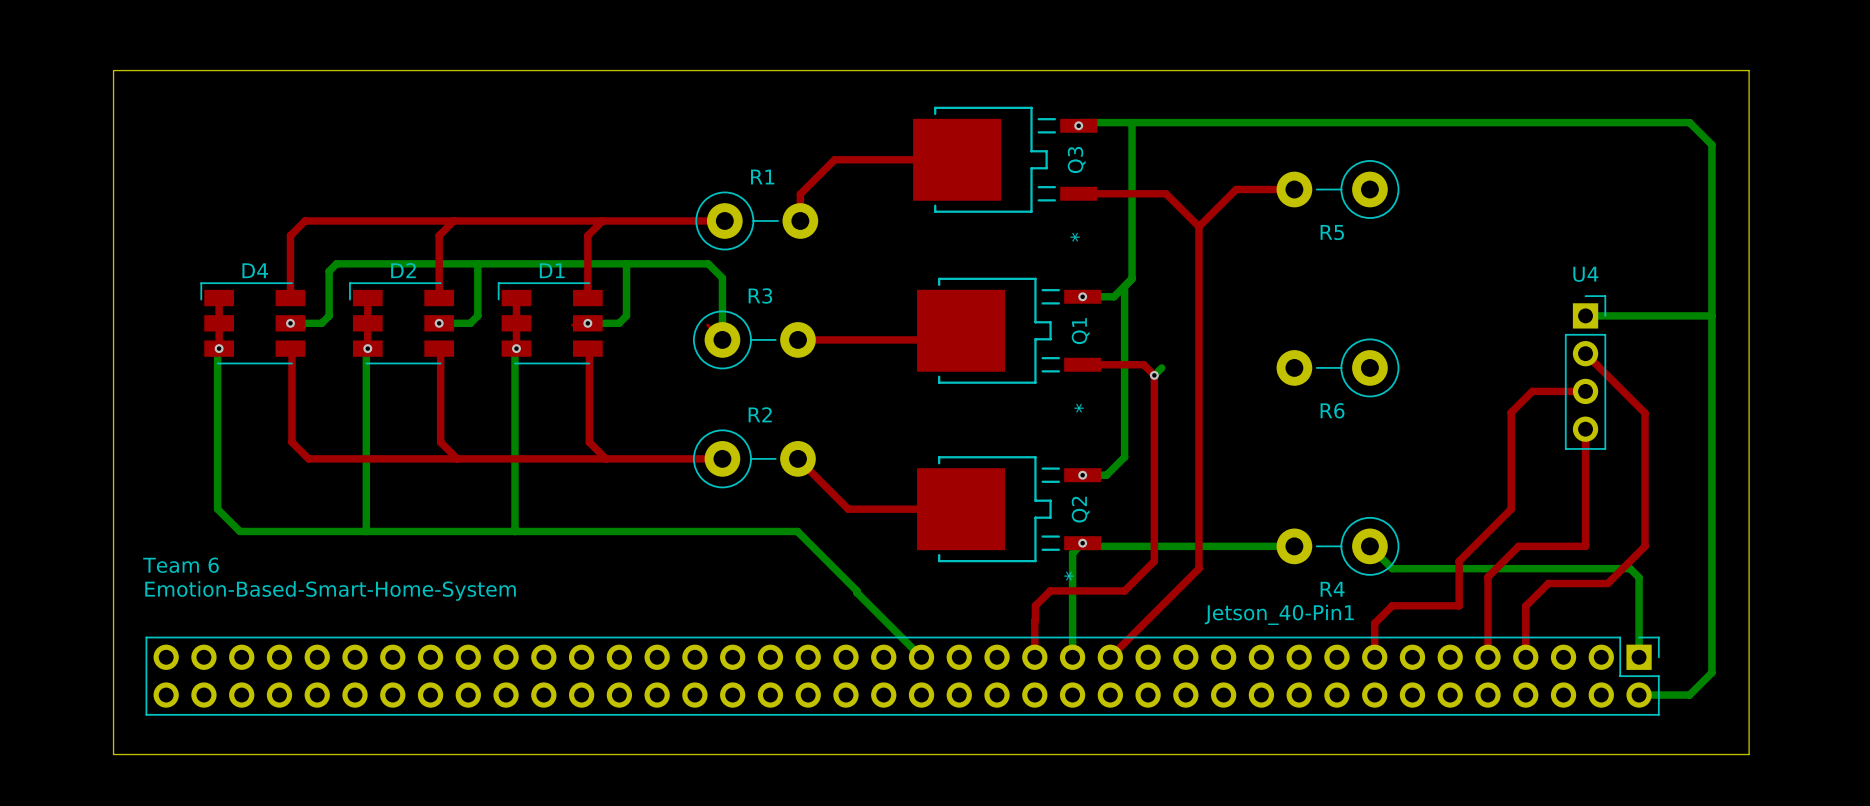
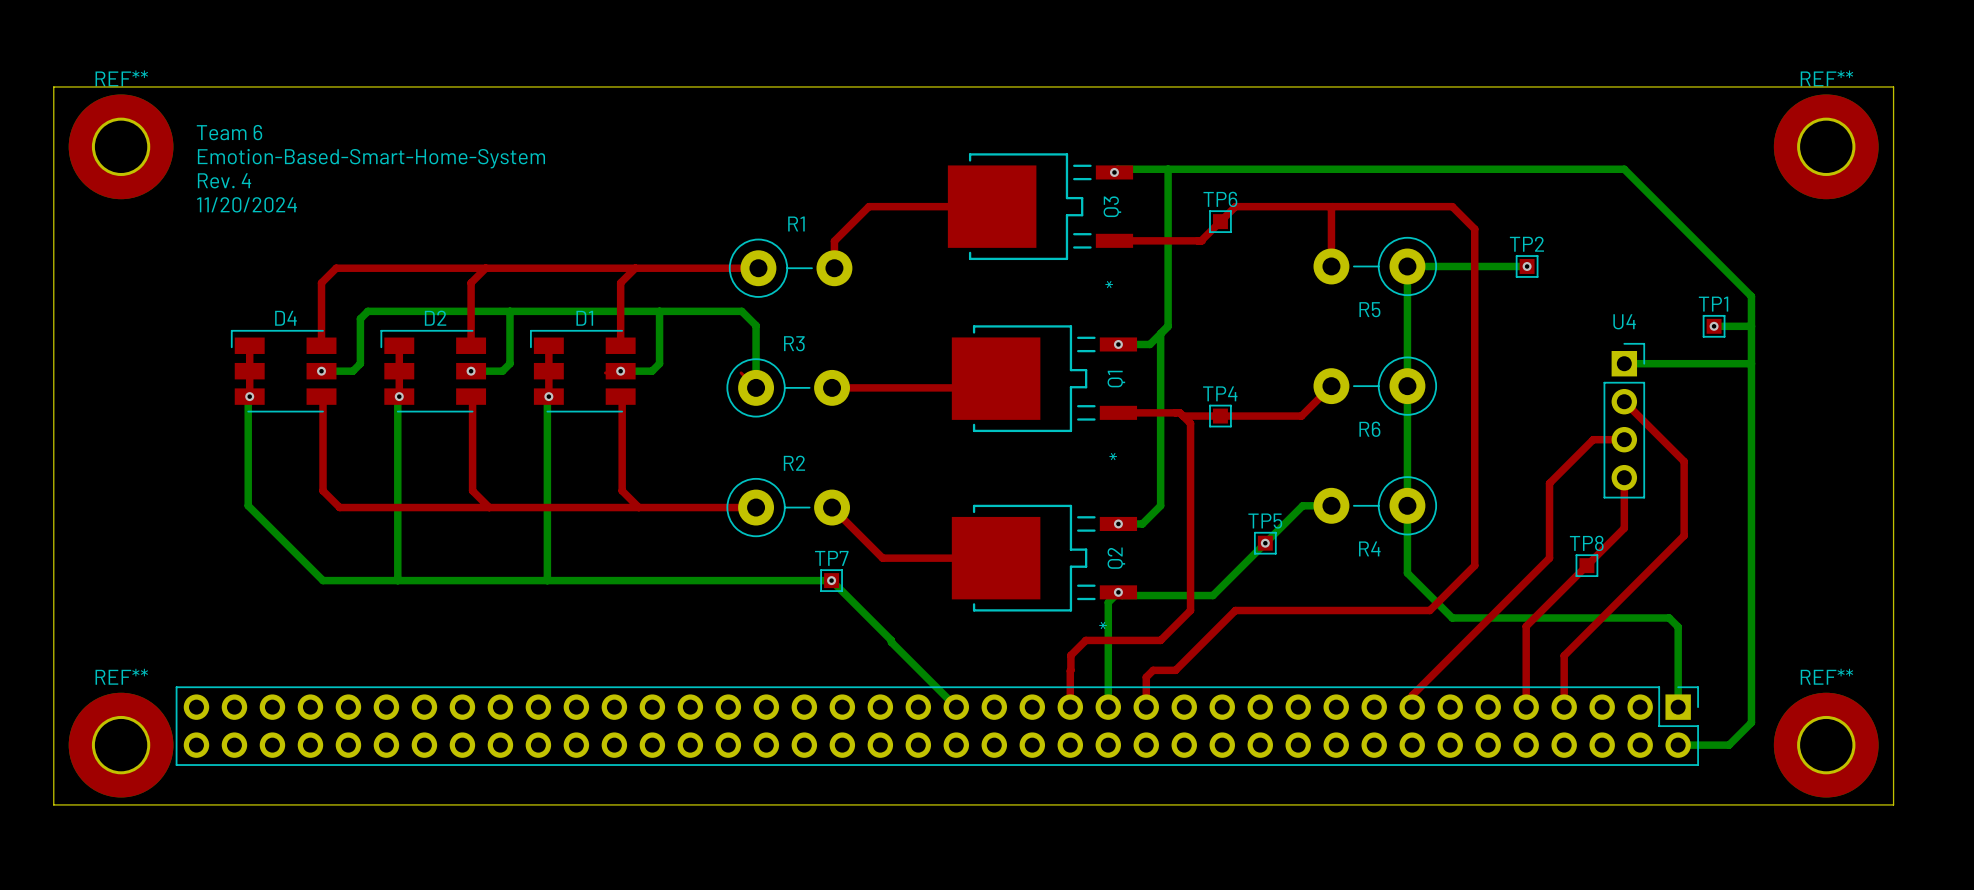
text: none -> Team 6 (229, 132)
REF**: none -> (121, 146)
REF**: none -> (1826, 146)
text: none -> Emotion-Based-Smart-Home-System (371, 158)
bottom track: (1585, 122) (1689, 122) (1711, 144) (1711, 248) -> (1624, 169) (1751, 296)
text: none -> Rev. 4 (224, 180)
text: none -> 11/20/2024 (247, 204)
top track: none -> (1332, 206) (1331, 266)
TP6: none -> (1220, 221)
top track: (1294, 189) (1236, 189) (1198, 226) -> none
R5 position: (1337, 189) -> (1375, 266)
top track: (1166, 193) (1198, 226) -> none
TP2: none -> (1527, 266)
via: none -> (1527, 266)
top track: (1198, 226) (1198, 568) (1110, 657) -> (1201, 240) (1235, 206) (1452, 206) (1474, 229) (1474, 565) (1429, 610) (1235, 610) (1175, 670) (1153, 670) (1146, 677) (1146, 707)
bottom track: none -> (1714, 326) (1751, 326)
TP1: none -> (1714, 326)
via: none -> (1714, 326)
top track: none -> (1331, 386) (1301, 416) (1183, 416)
bottom track: (1161, 367) (1154, 375) -> none
TP4: none -> (1220, 416)
R6 position: (1337, 367) -> (1375, 386)
via: (1154, 375) -> none
top track: (1554, 391) (1532, 391) (1511, 412) (1511, 434) -> (1593, 439) (1549, 483)
bottom track: (217, 457) (217, 509) (239, 531) (291, 531) -> (248, 505) (323, 580)
top track: (1585, 479) (1585, 546) (1518, 546) -> (1624, 528) (1557, 595)
top track: (1645, 486) (1645, 546) (1607, 583) (1548, 583) -> (1684, 535) (1586, 632)
TP5: none -> (1265, 543)
via: none -> (1265, 543)
TP8: none -> (1586, 565)
TP7: none -> (831, 580)
via: none -> (831, 580)
bottom track: (1176, 546) (1294, 546) -> (1212, 595) (1302, 505) (1331, 505)
R4 position: (1337, 546) -> (1375, 505)
bottom track: (1369, 546) (1392, 568) (1414, 568) -> (1527, 266) (1407, 266) (1407, 573) (1452, 617)
top track: (1459, 561) (1459, 605) (1392, 605) (1374, 623) (1374, 645) -> (1497, 610) (1412, 695)
text: Team 6 (181, 565) -> none
text: Emotion-Based-Smart-Home-System (330, 590) -> none
Jetson_40-Pin1 name: Jetson_40-Pin1 (1279, 614) -> none
REF**: none -> (121, 745)
REF**: none -> (1826, 745)
board edge: (113, 754) (113, 70) (1749, 70) (1749, 754) -> (143, 804) (53, 804) (53, 86) (1893, 86) (1893, 804) (1788, 804)

